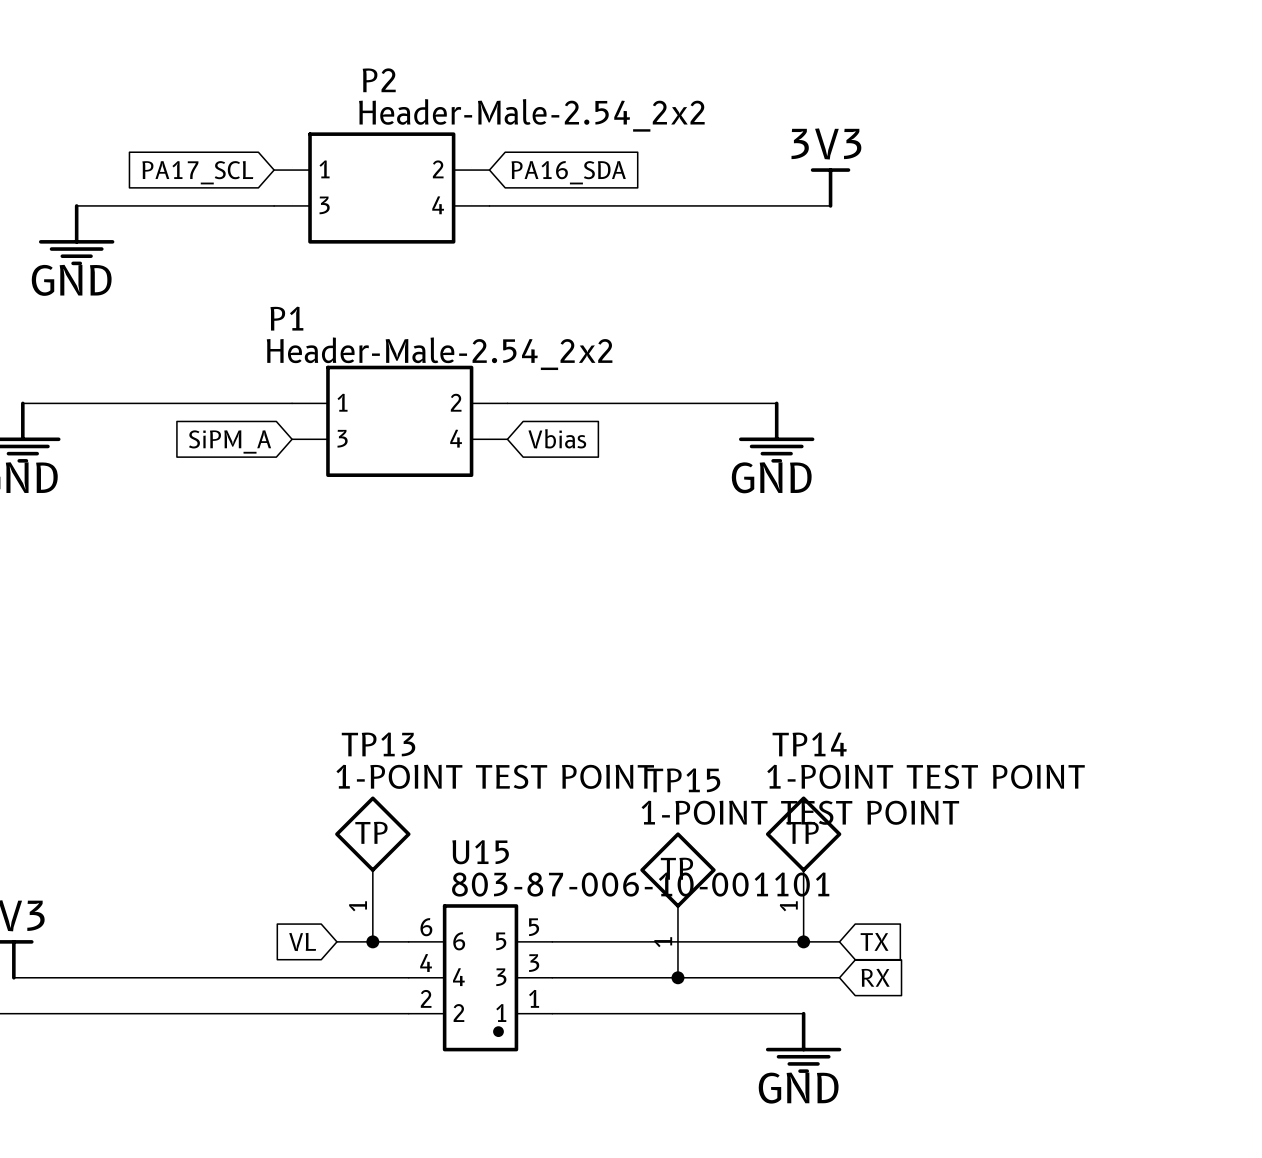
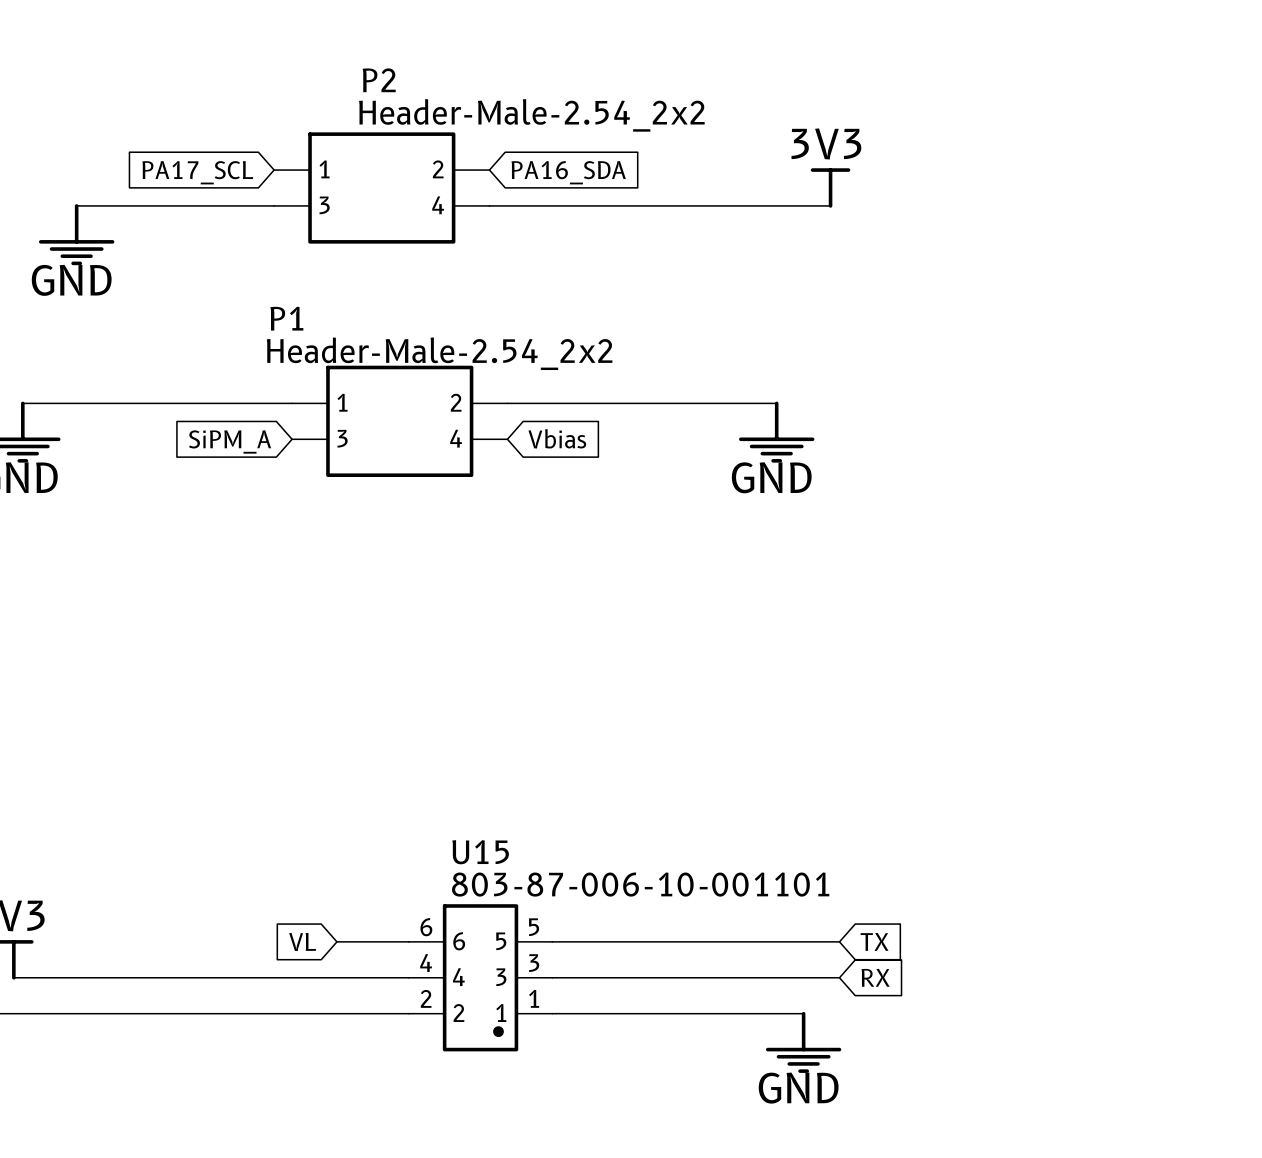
TP13: 1-POINT TEST POINT (372, 869) -> none
TP14: 1-POINT TEST POINT (803, 869) -> none
TP15: 1-POINT TEST POINT (677, 905) -> none
junction: (372, 941) -> none
junction: (803, 941) -> none
junction: (677, 977) -> none

